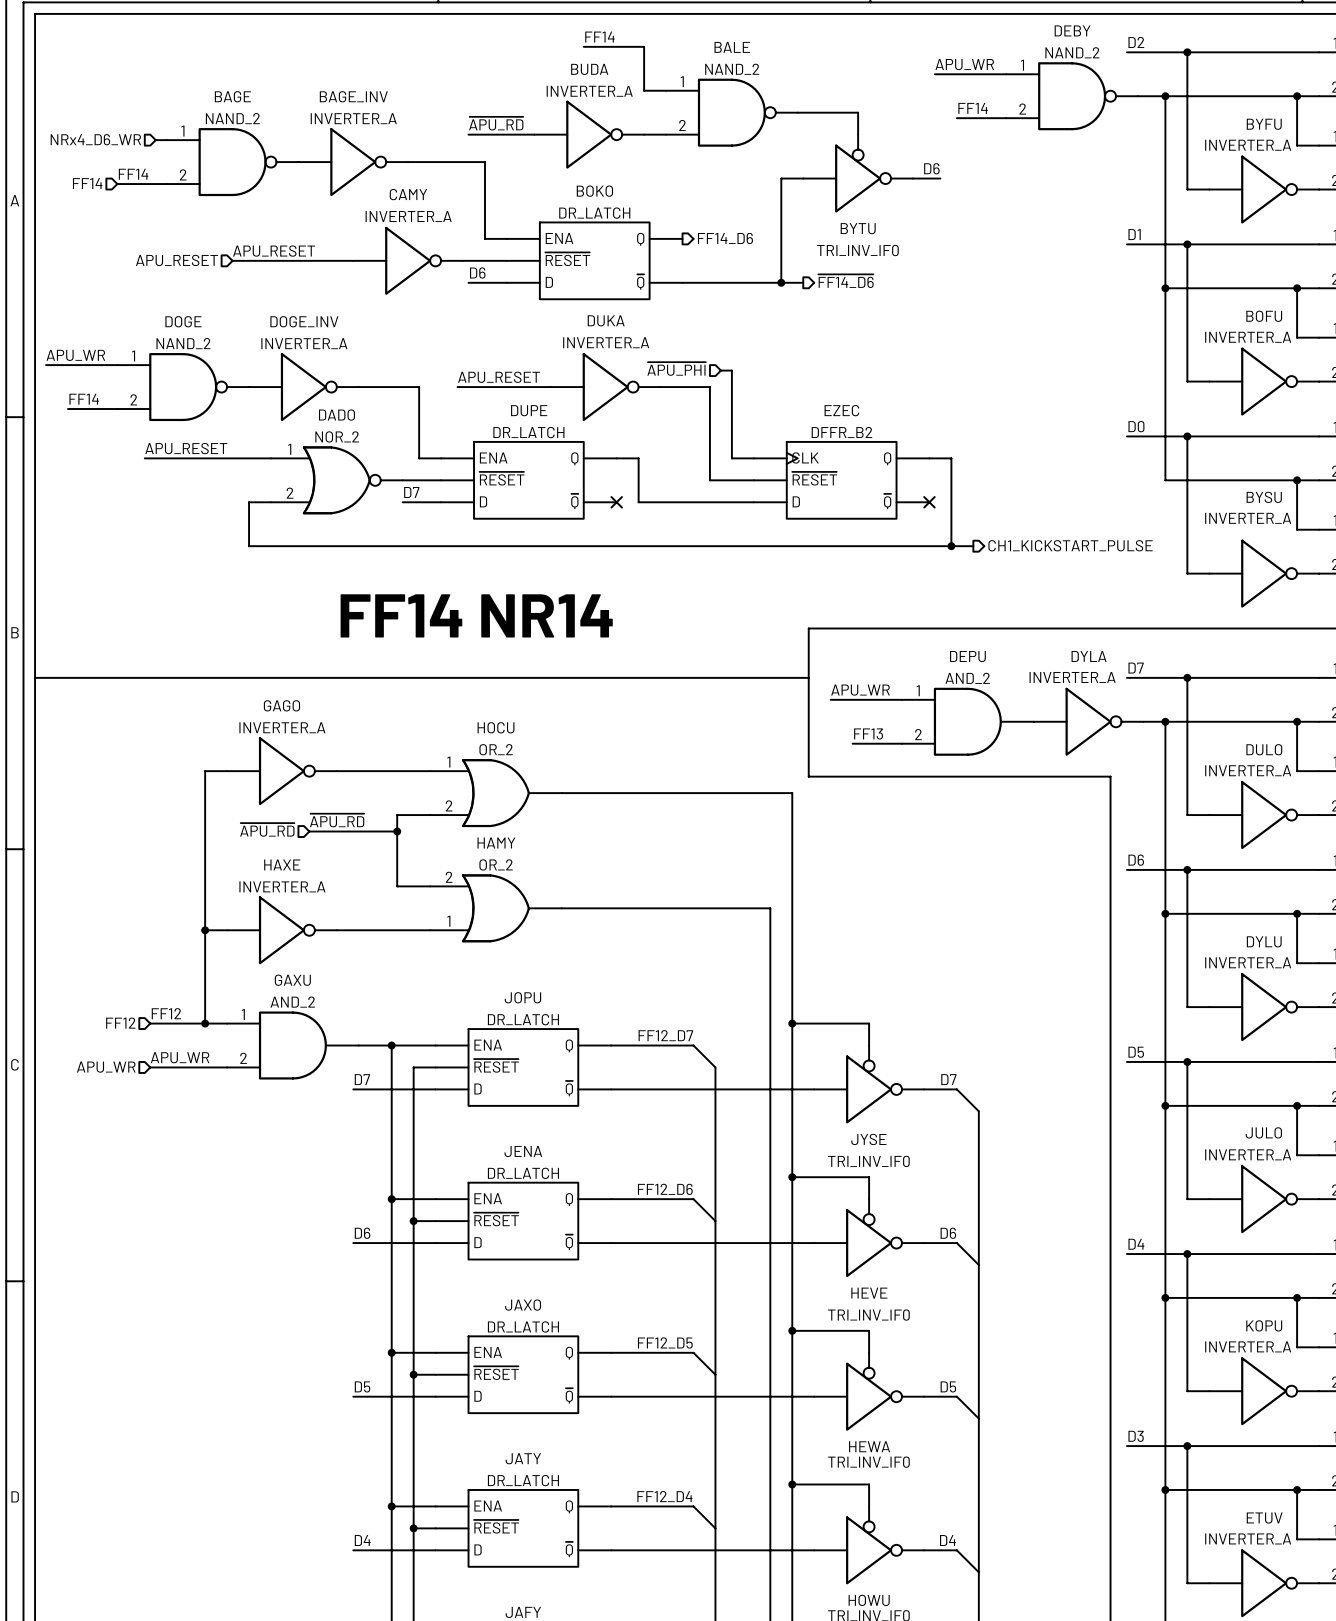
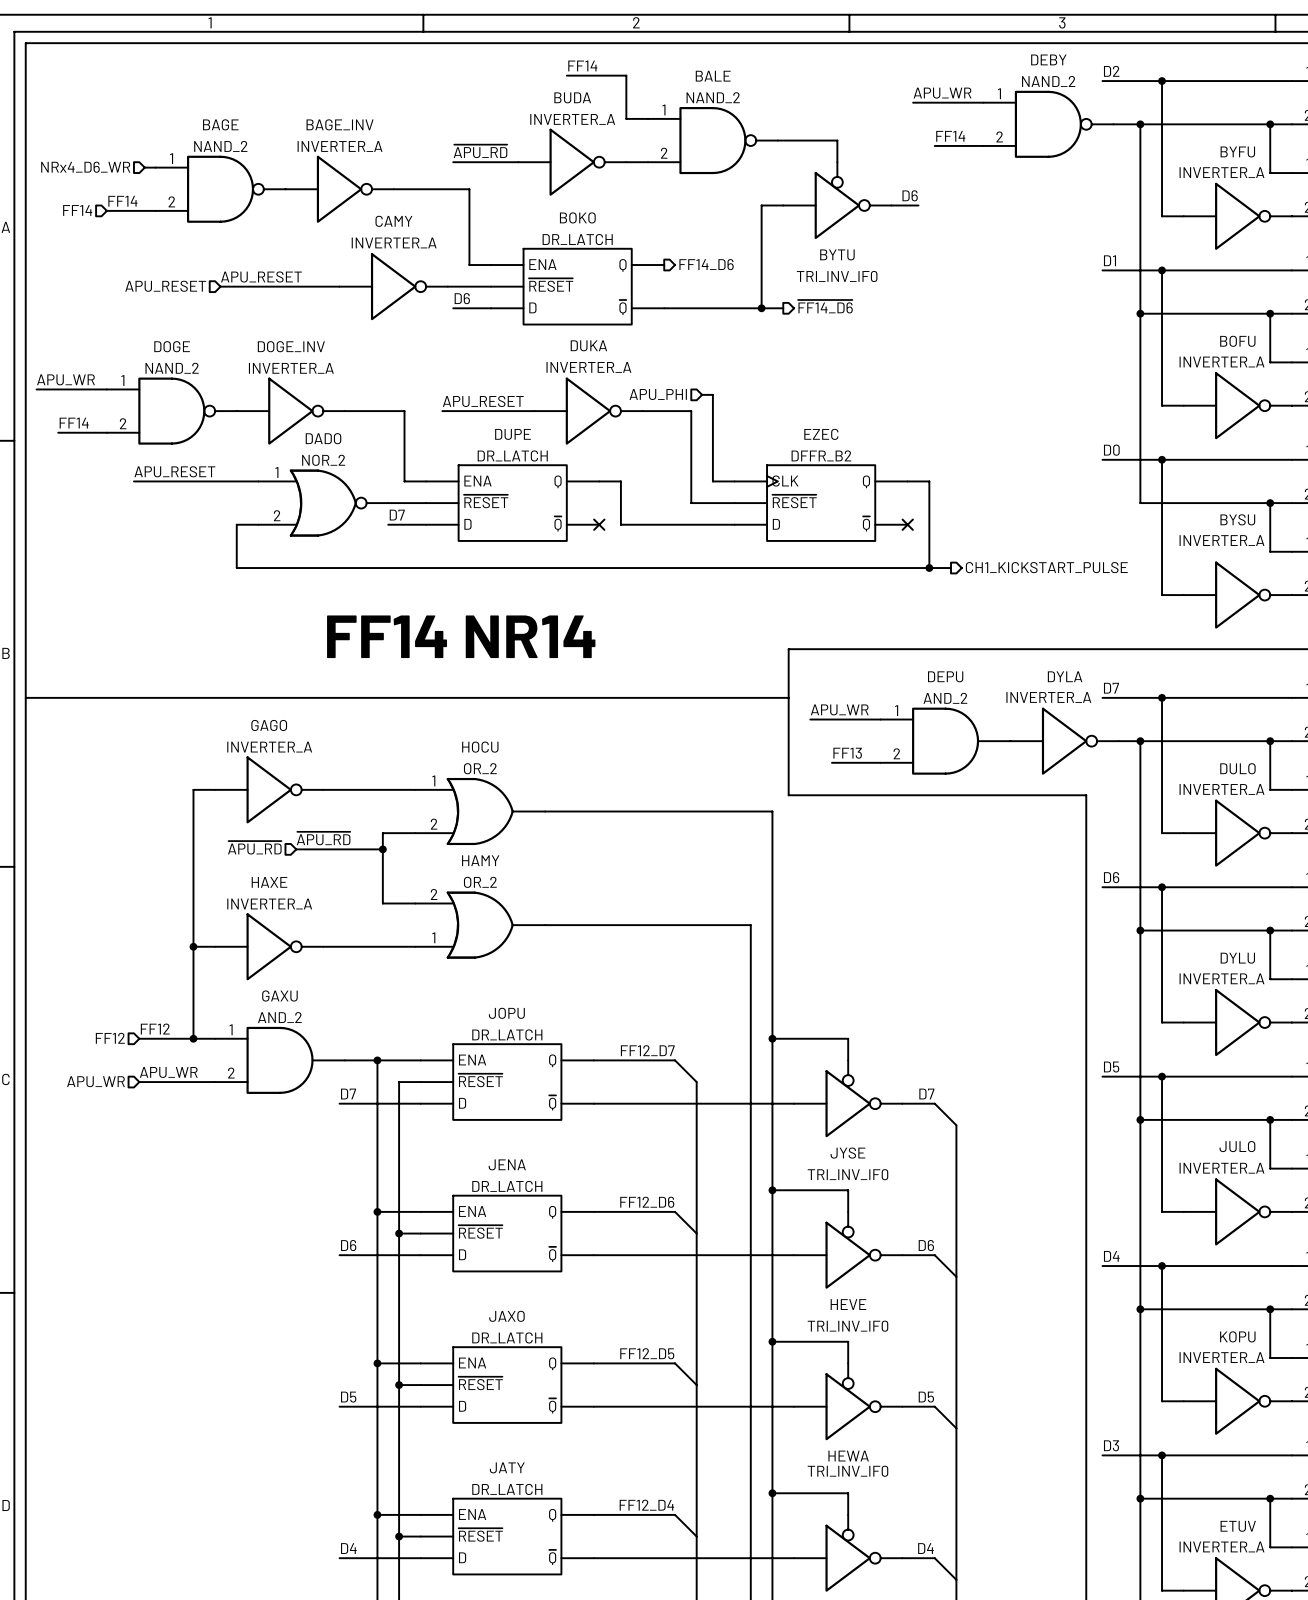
hierarchical label: ~{APU_PHI} (676, 368) -> APU_PHI (658, 394)

